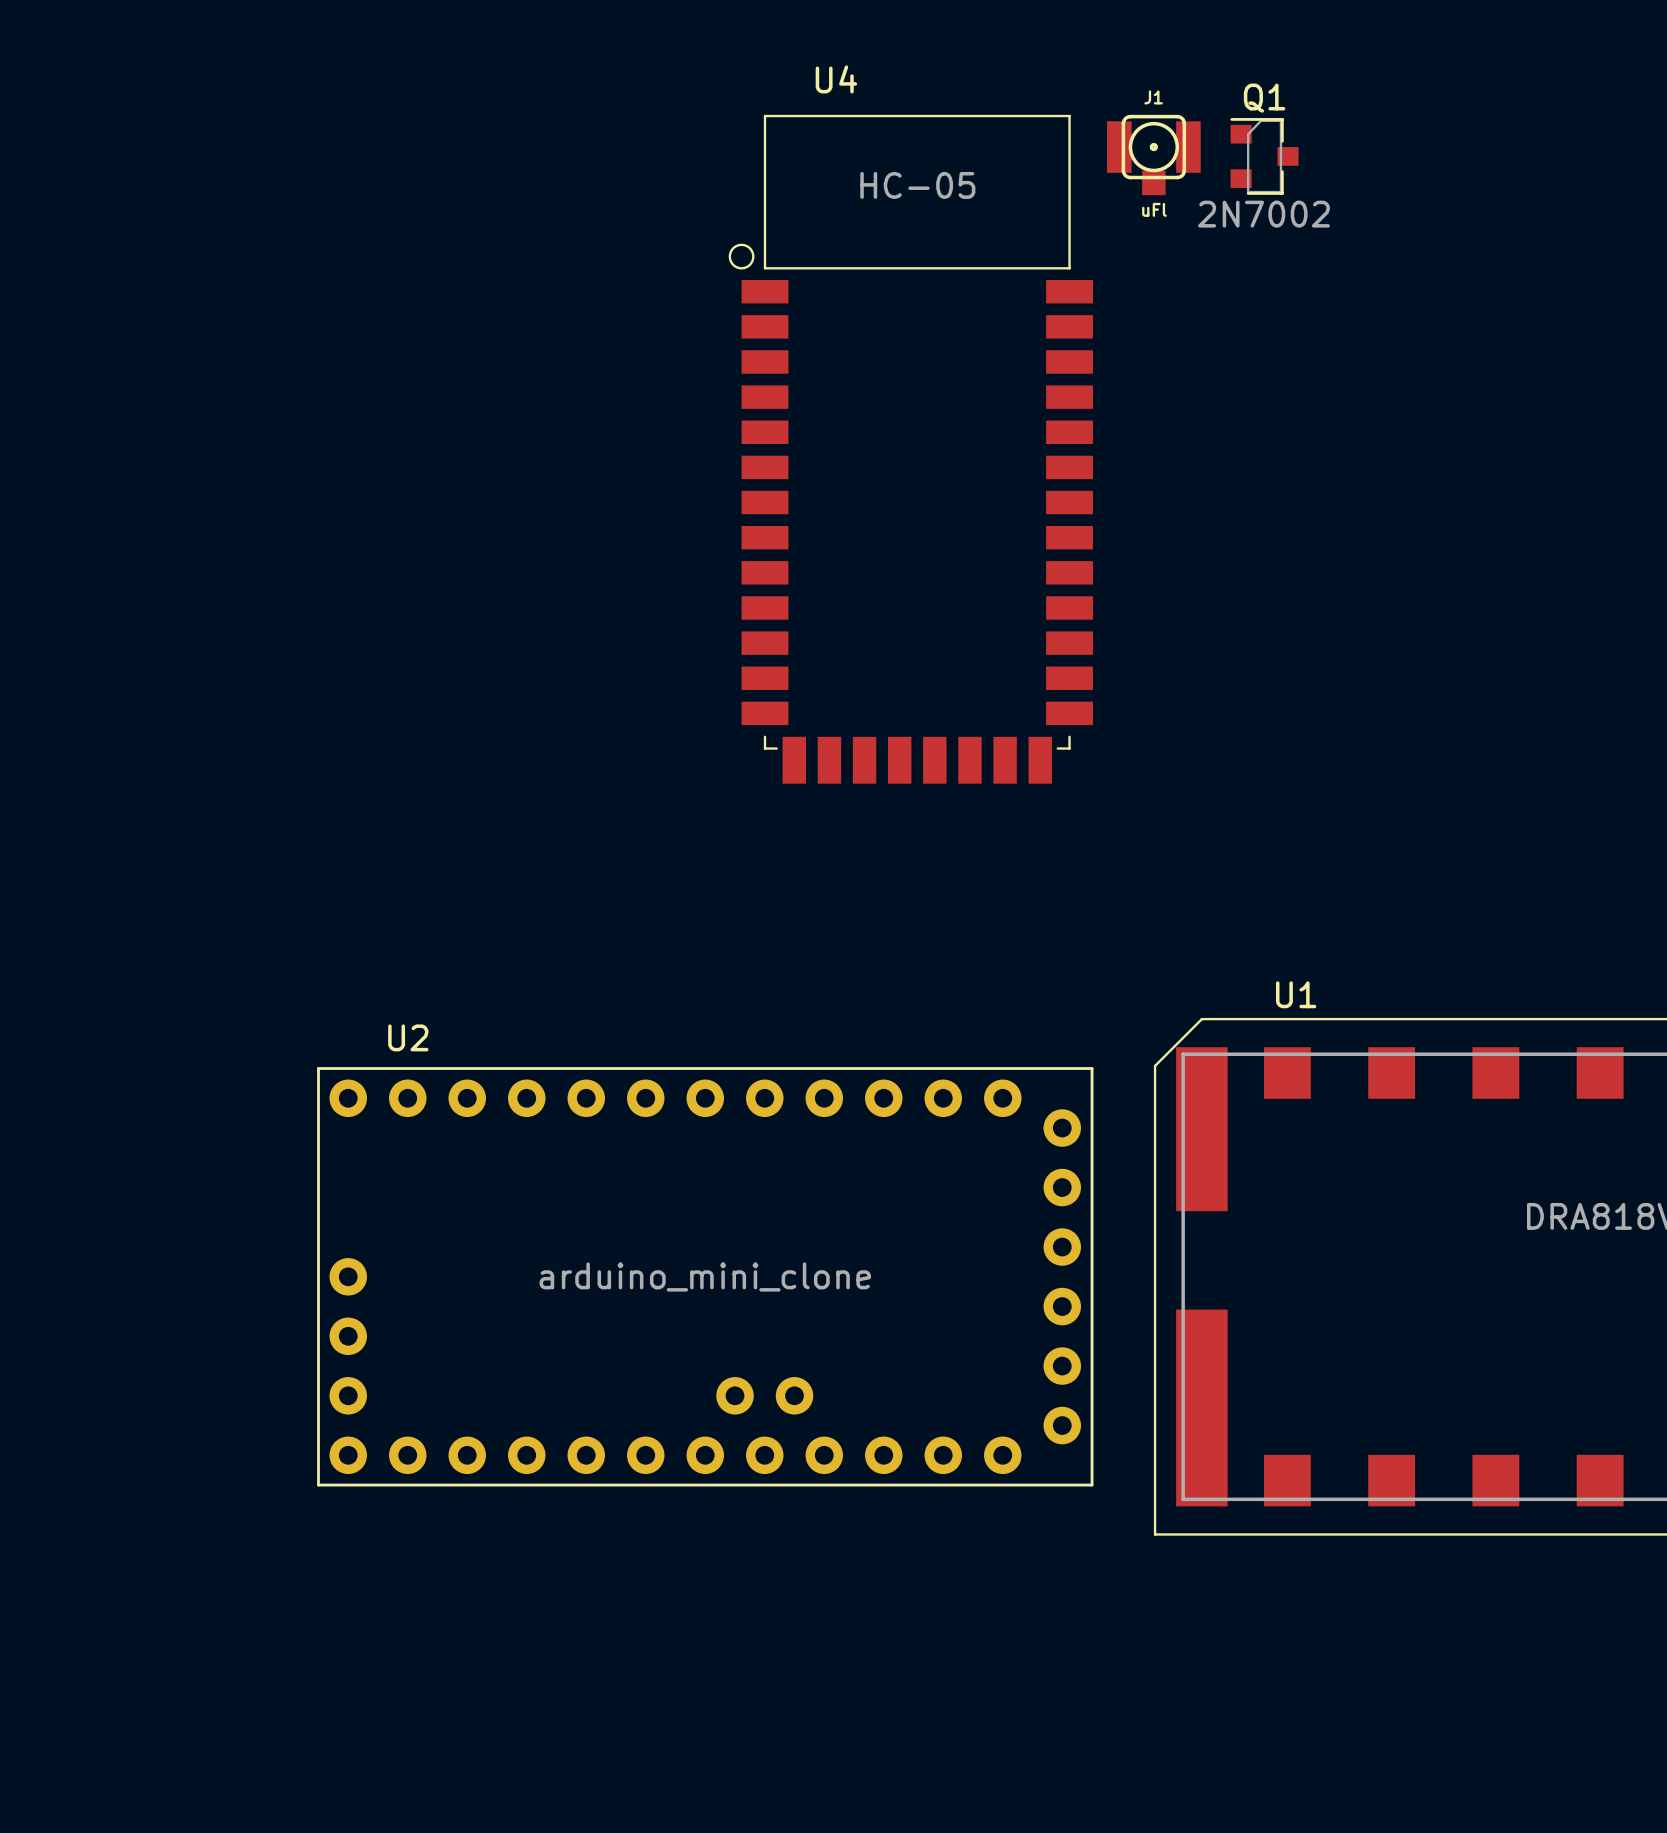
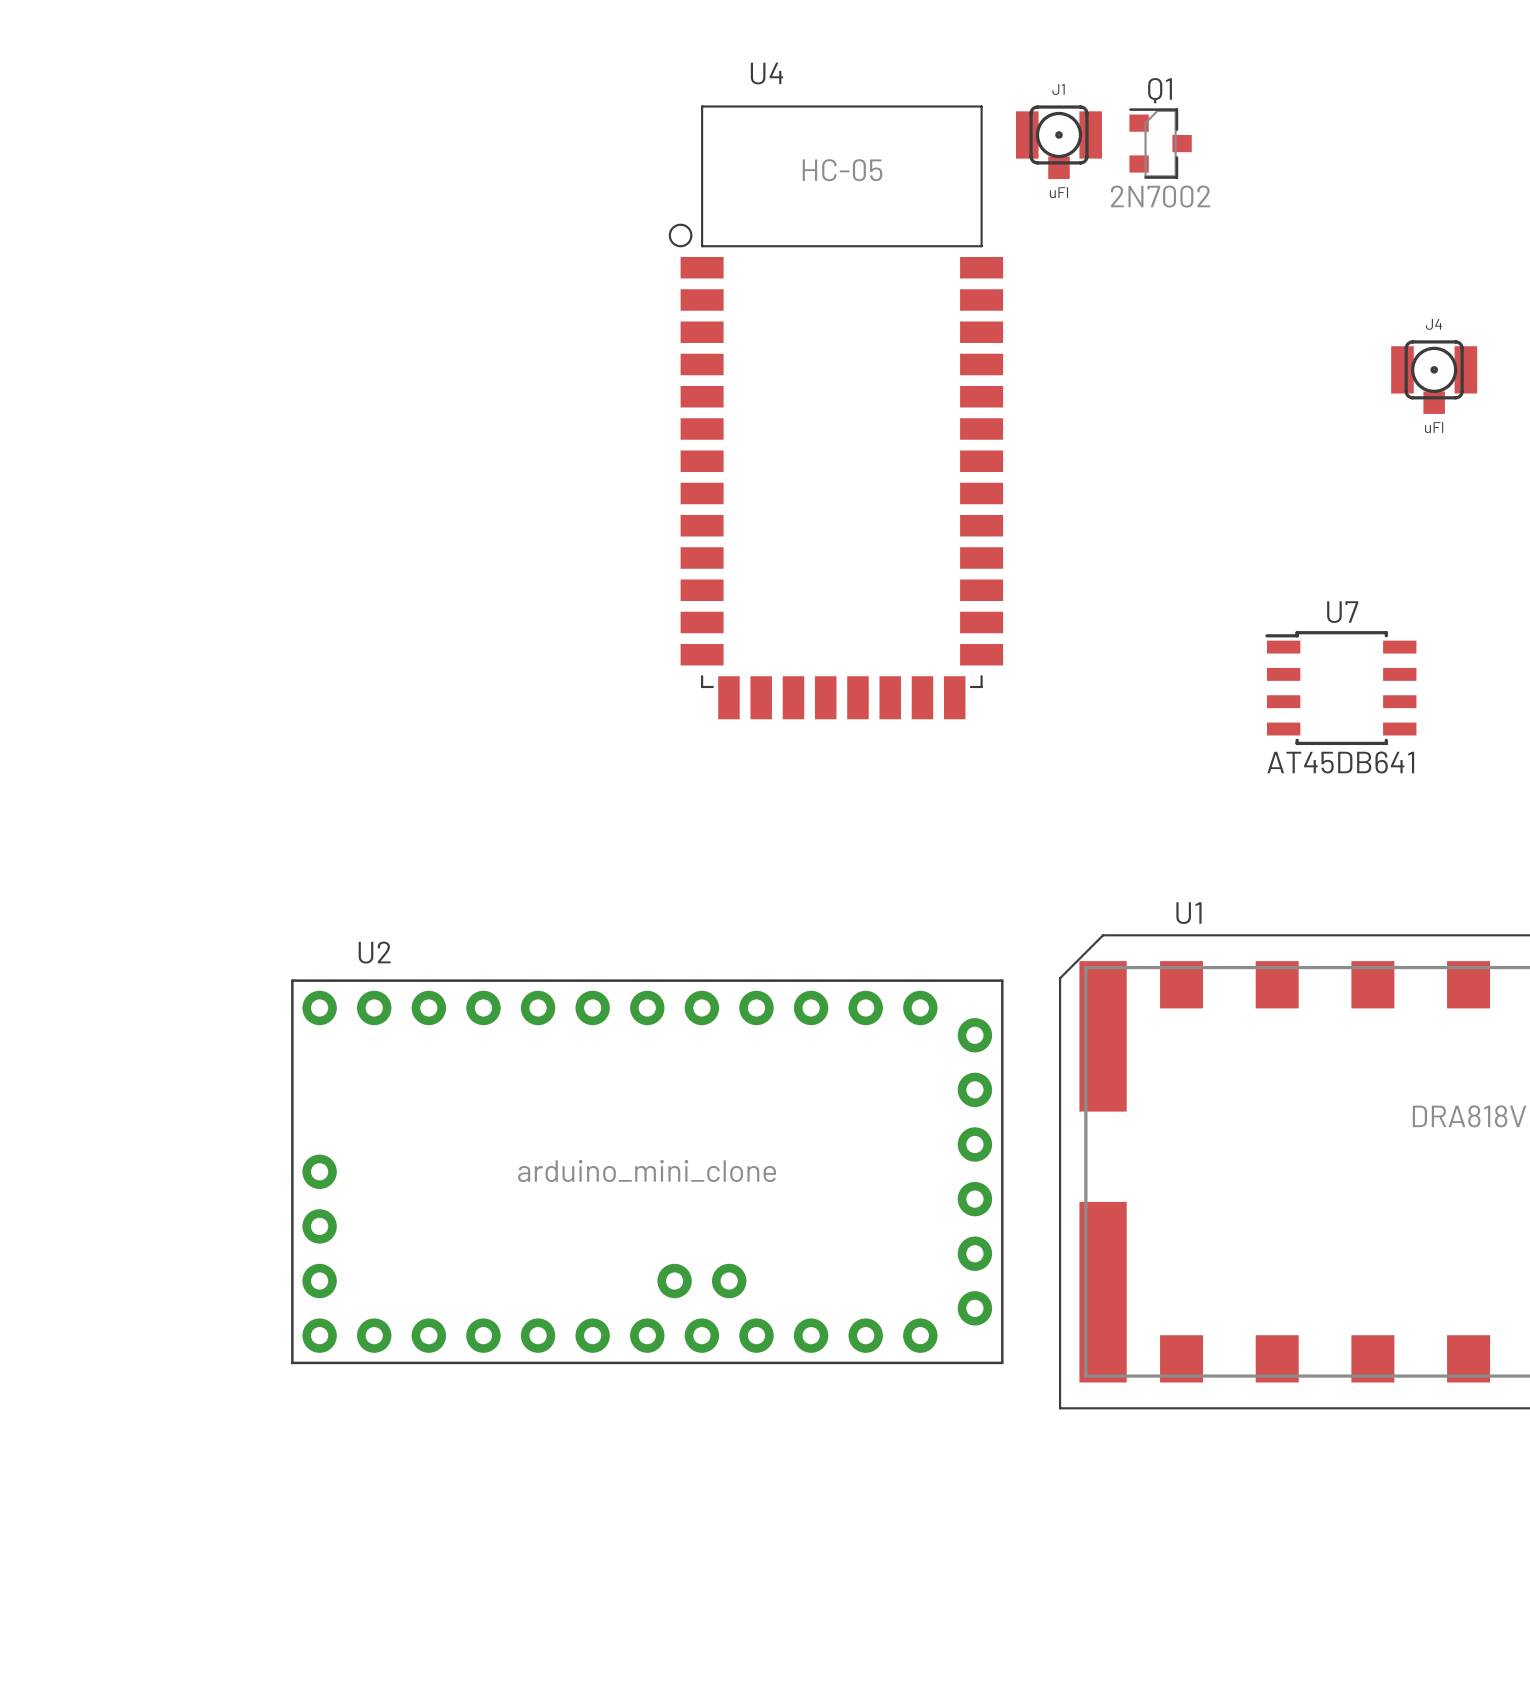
J4: none -> uFl (1434, 377)
U7: none -> AT45DB641 (1340, 688)

